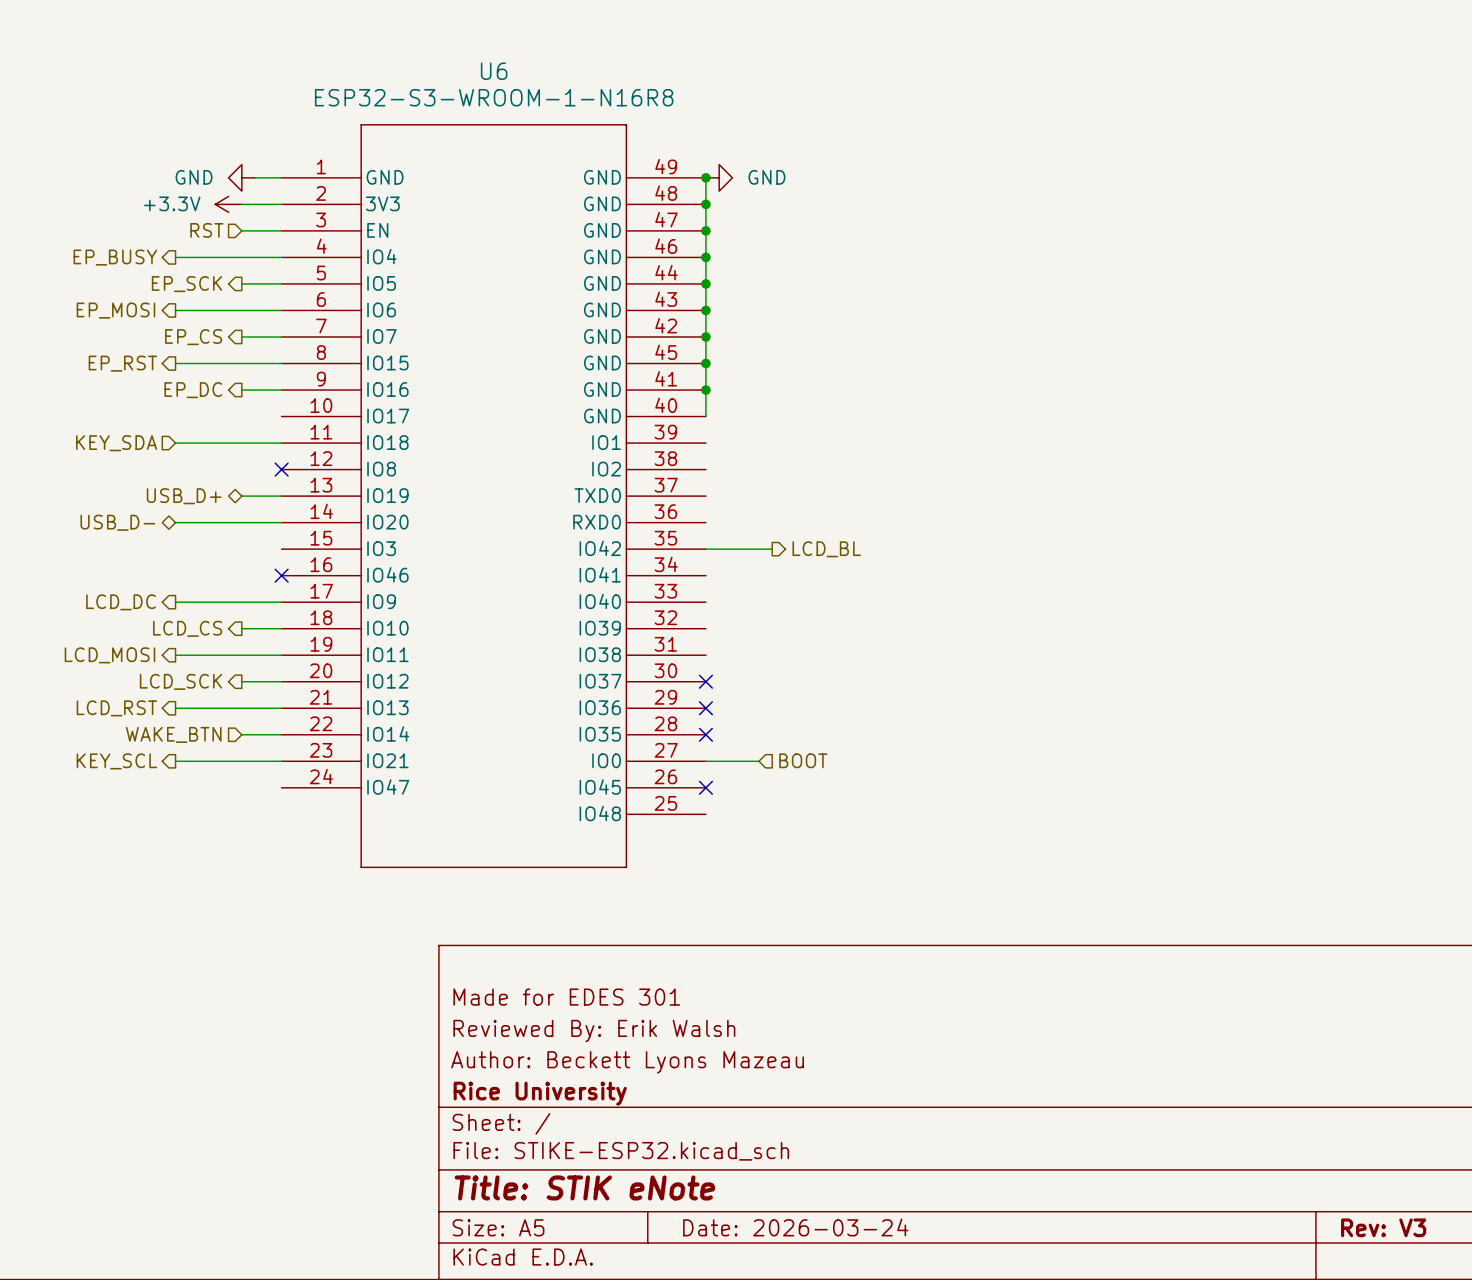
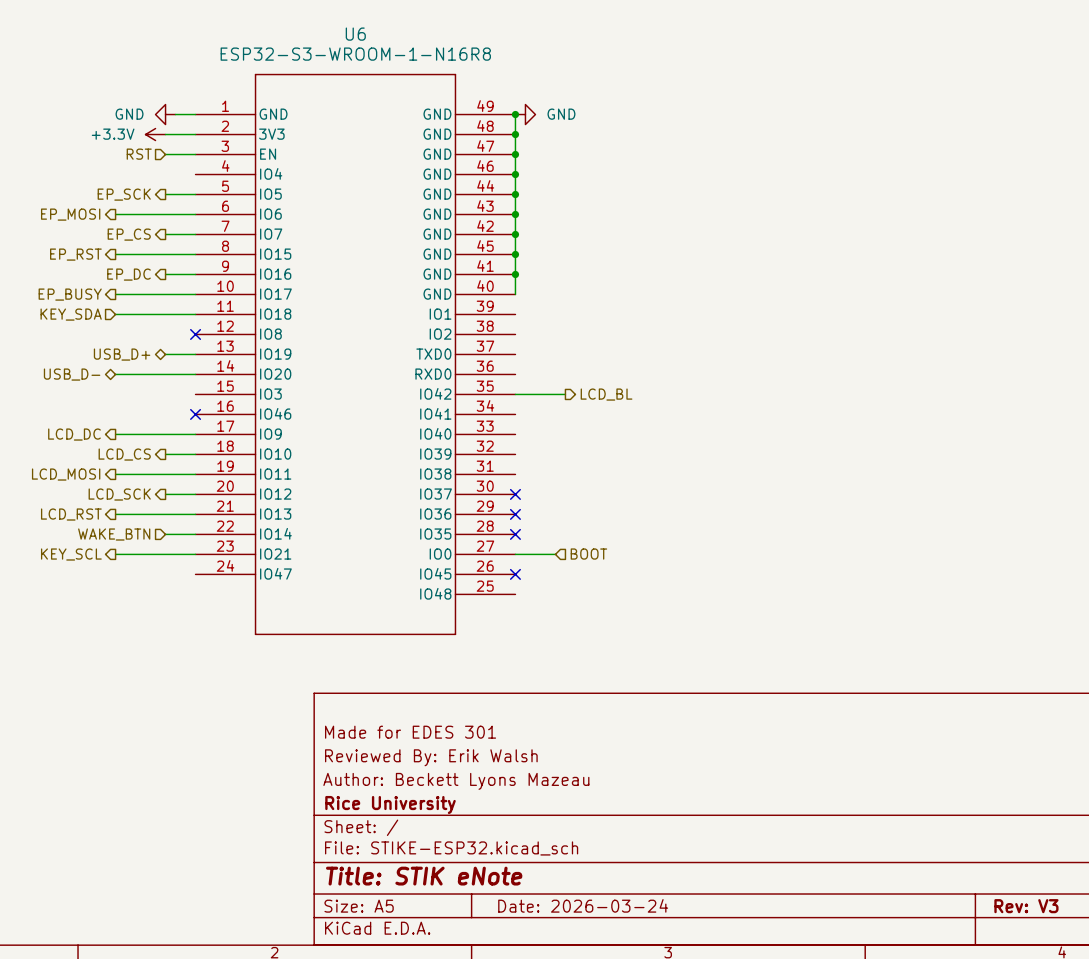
hierarchical label position: EP_BUSY (115, 257) -> EP_BUSY (70, 294)
wire: (175, 257) (281, 257) -> (115, 294) (195, 294)

